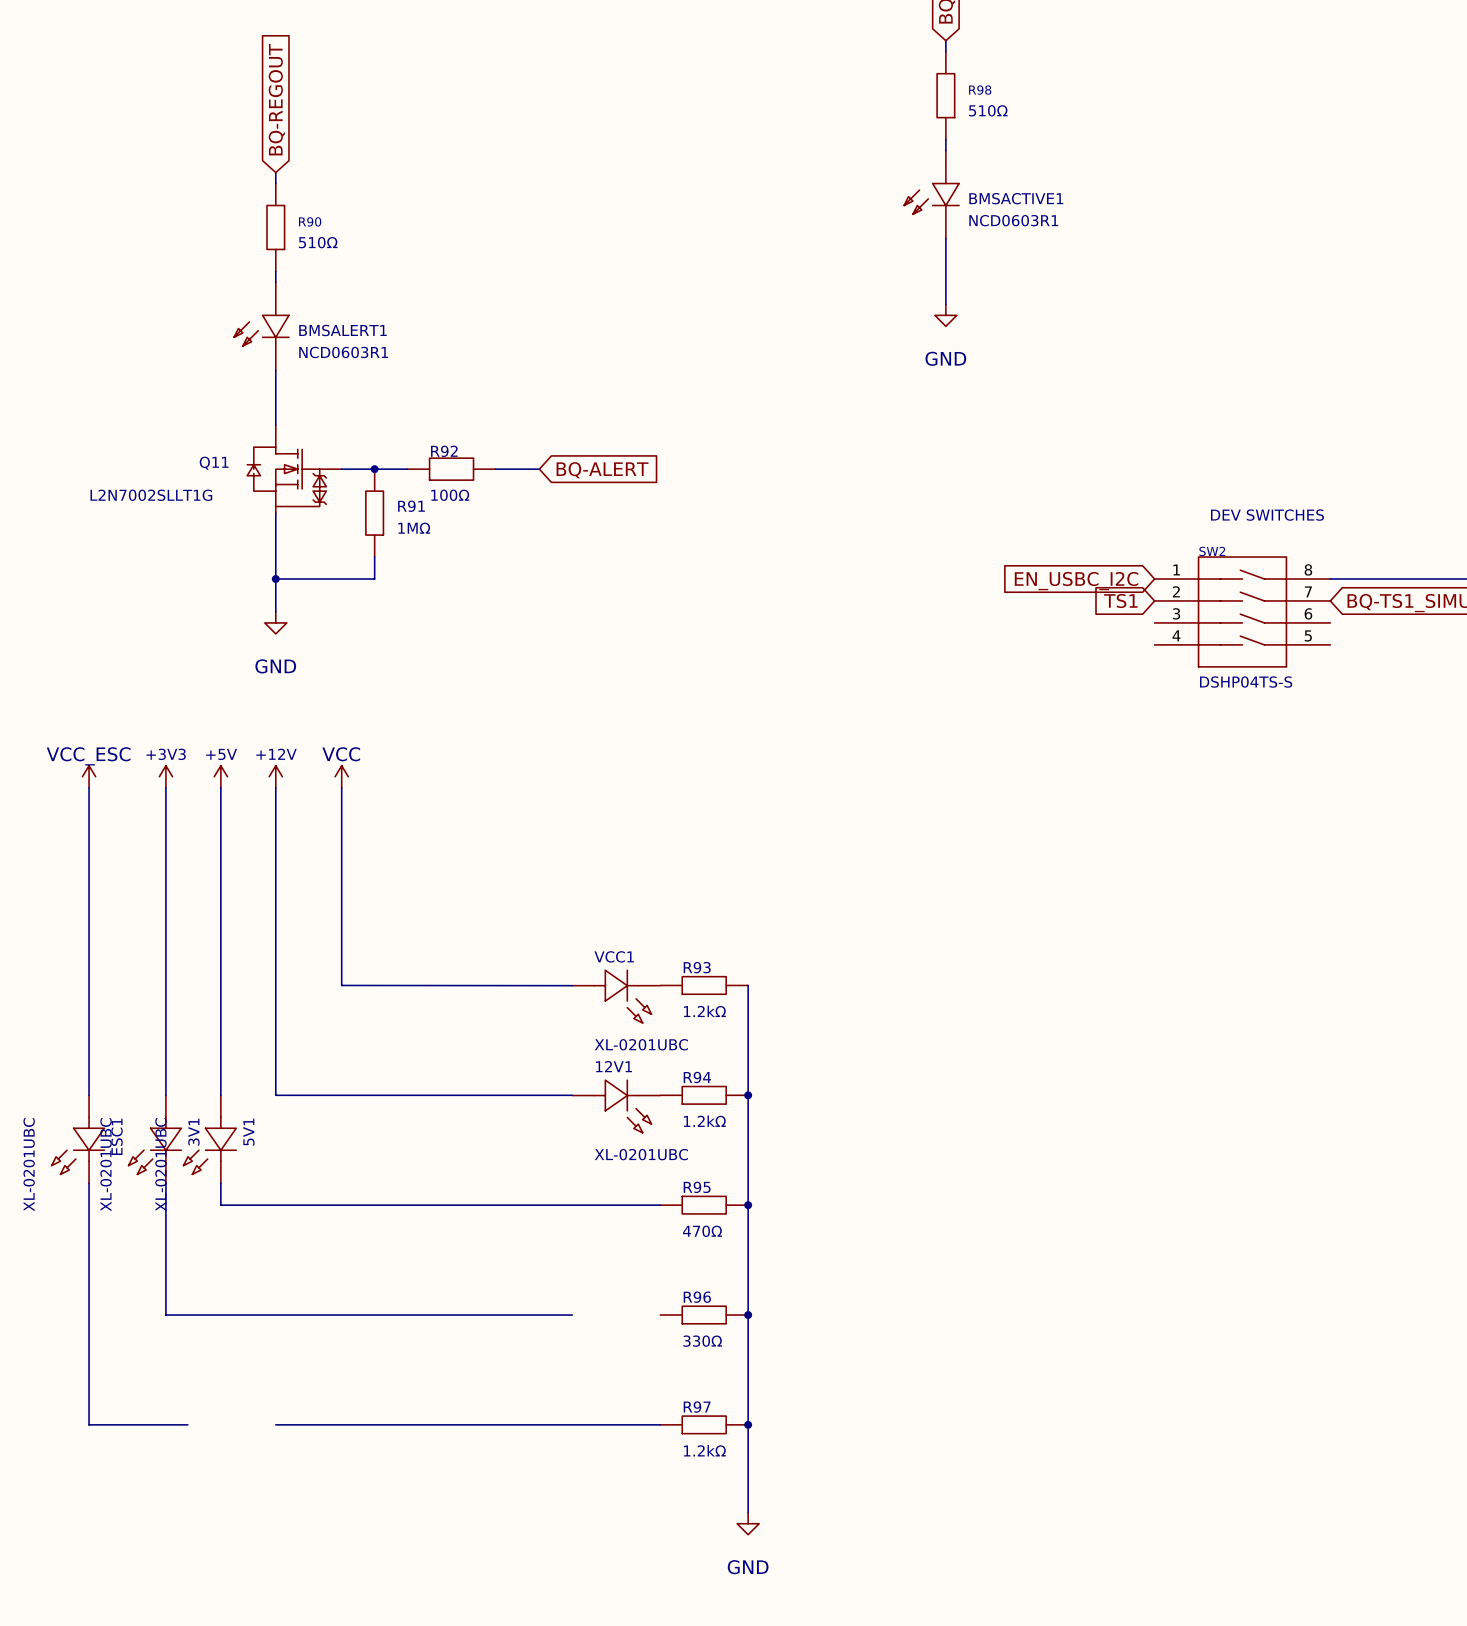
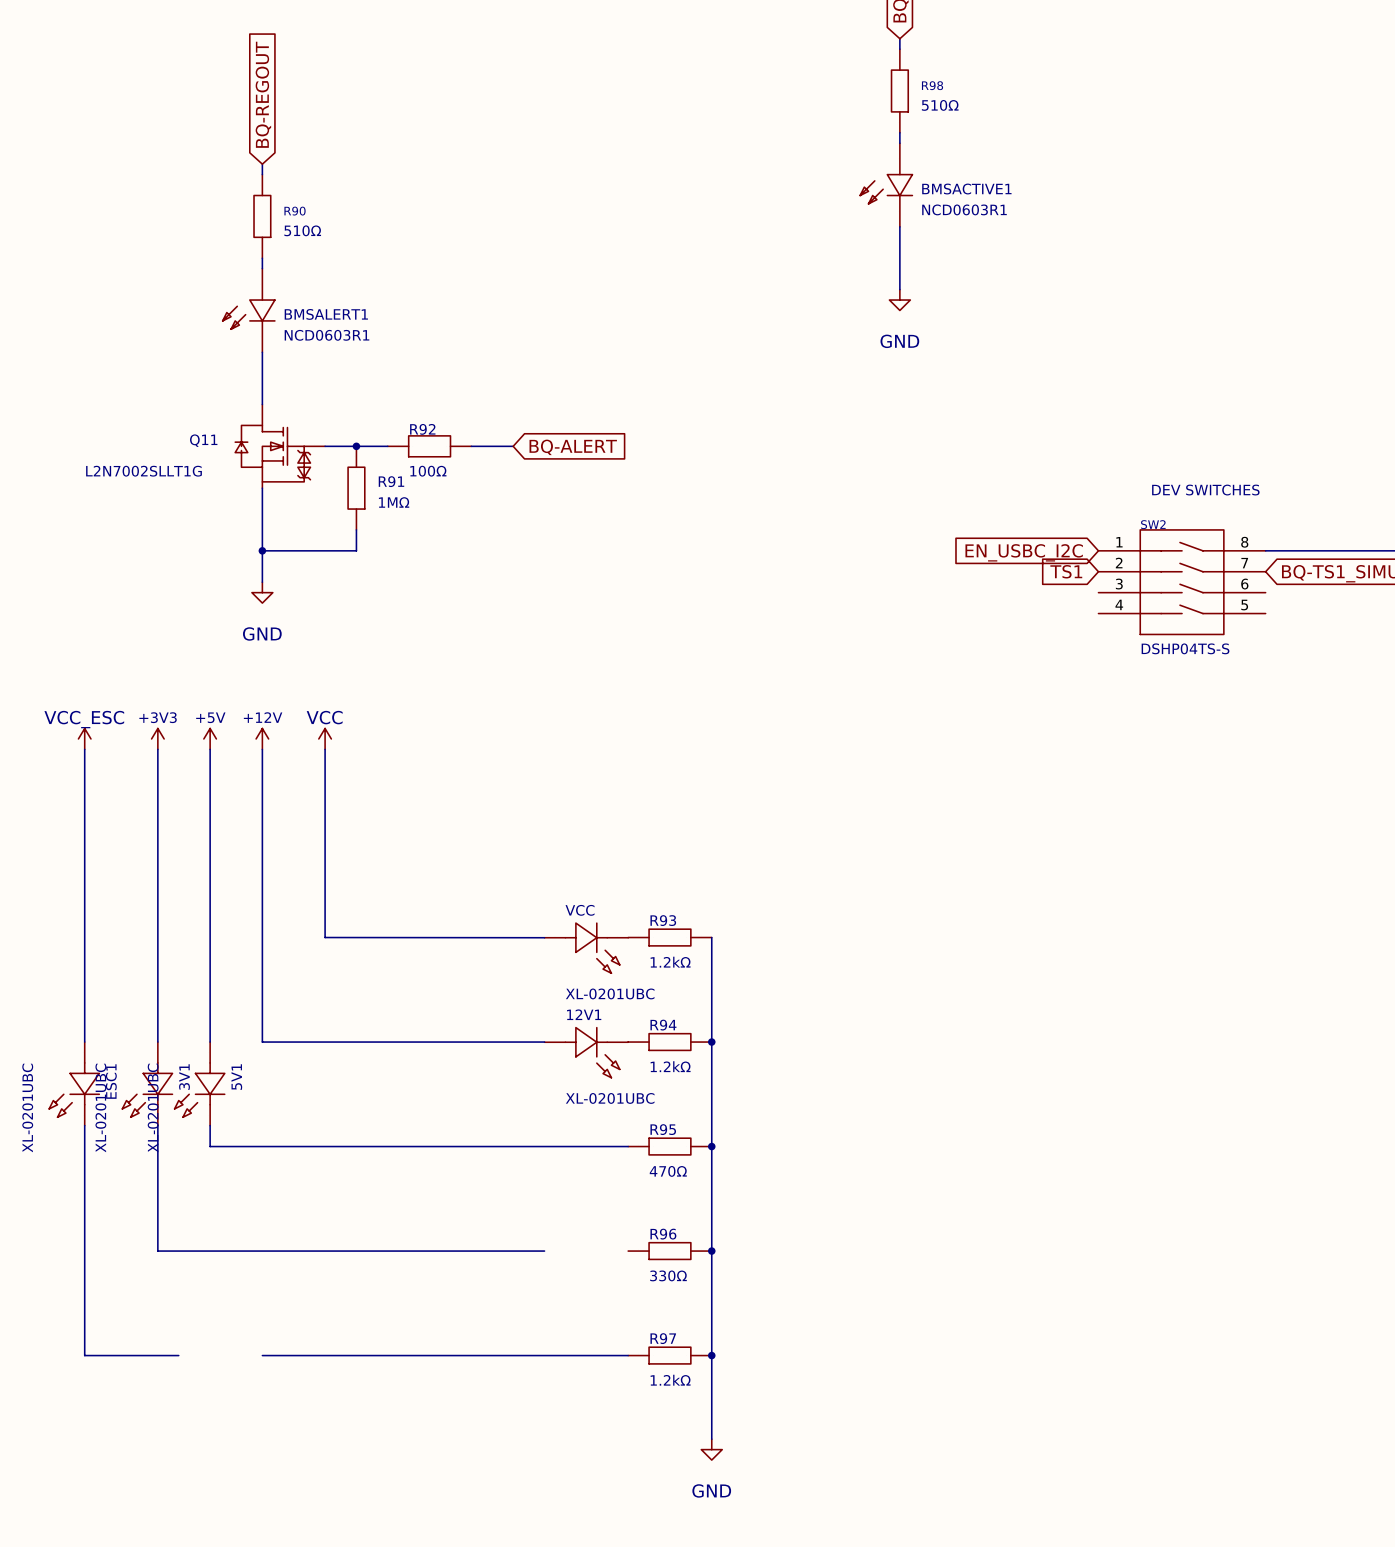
VCC1 name: VCC1 (614, 956) -> VCC (580, 910)

